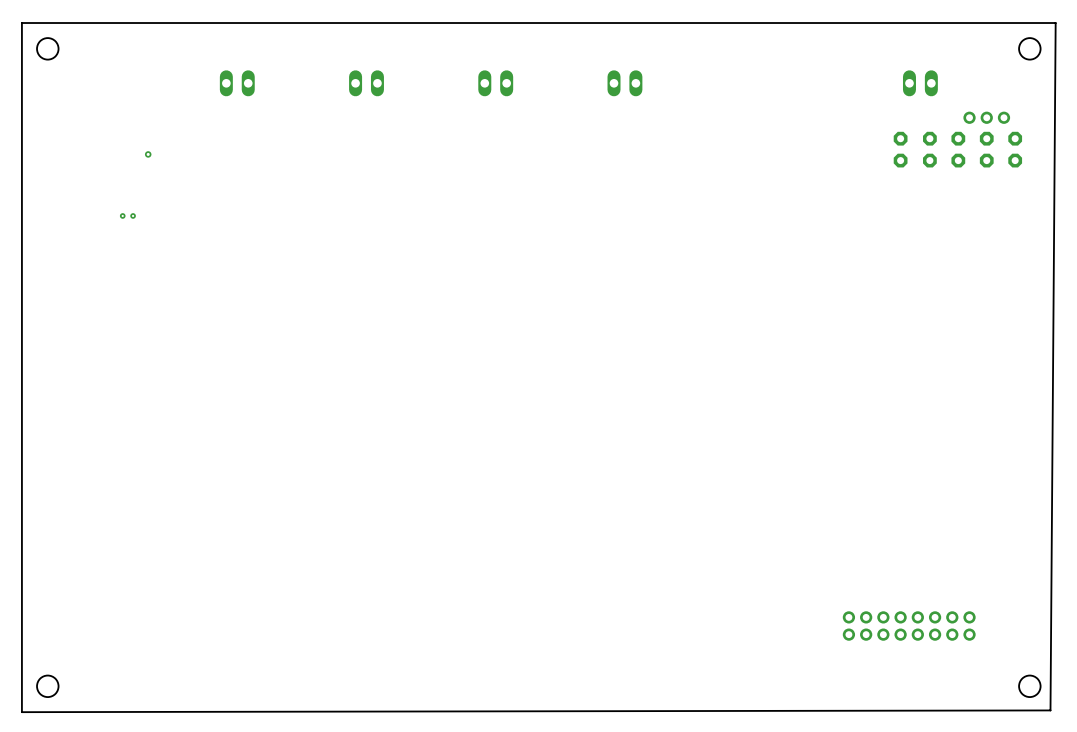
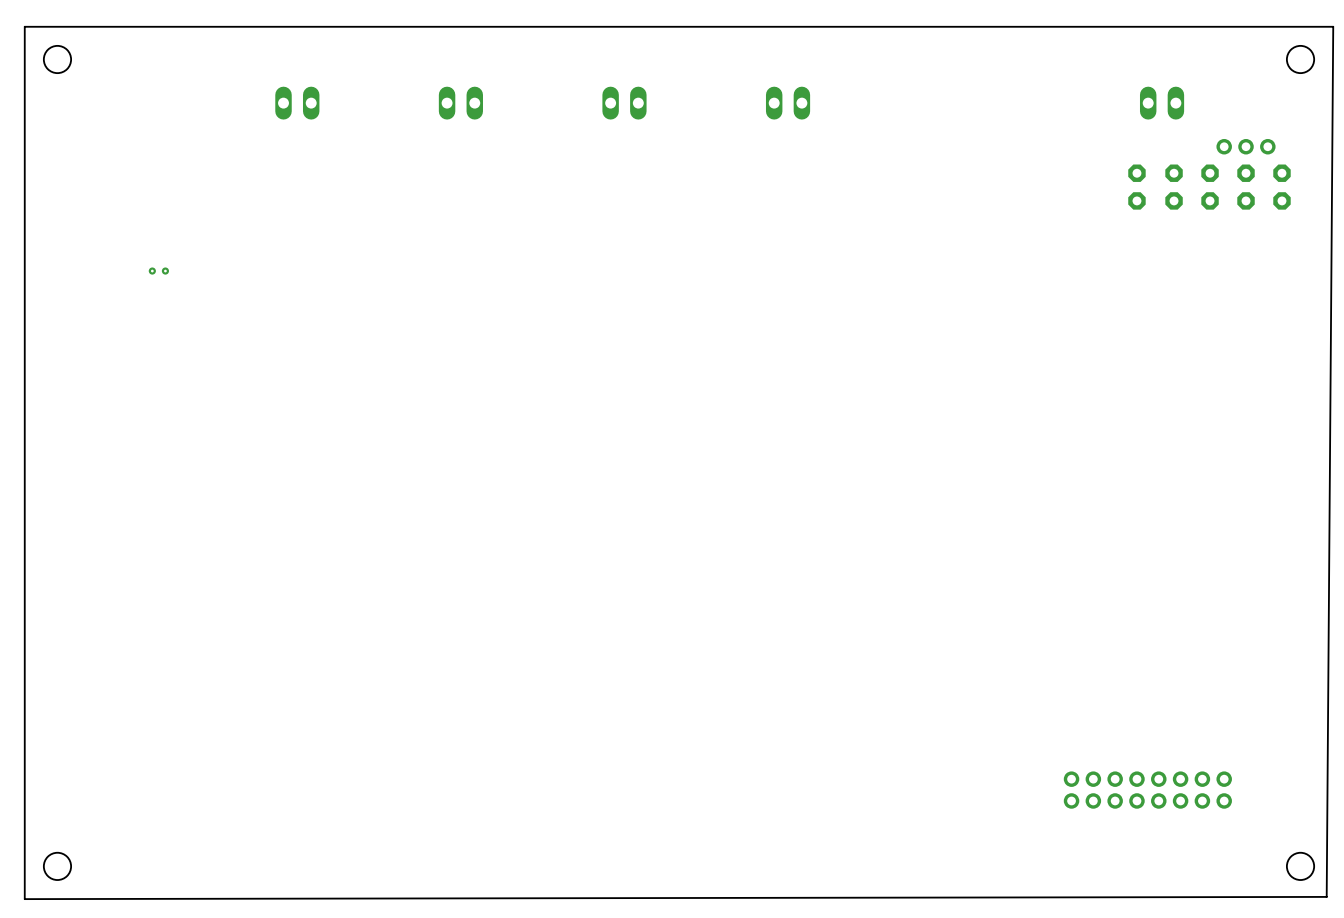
via: (148, 154) -> none

